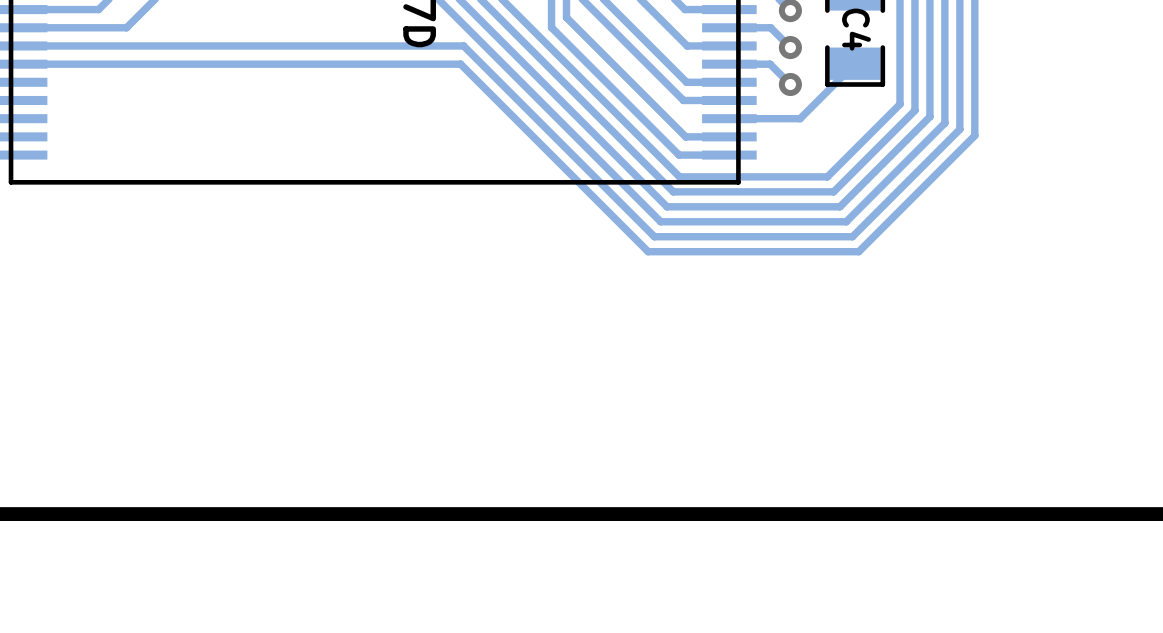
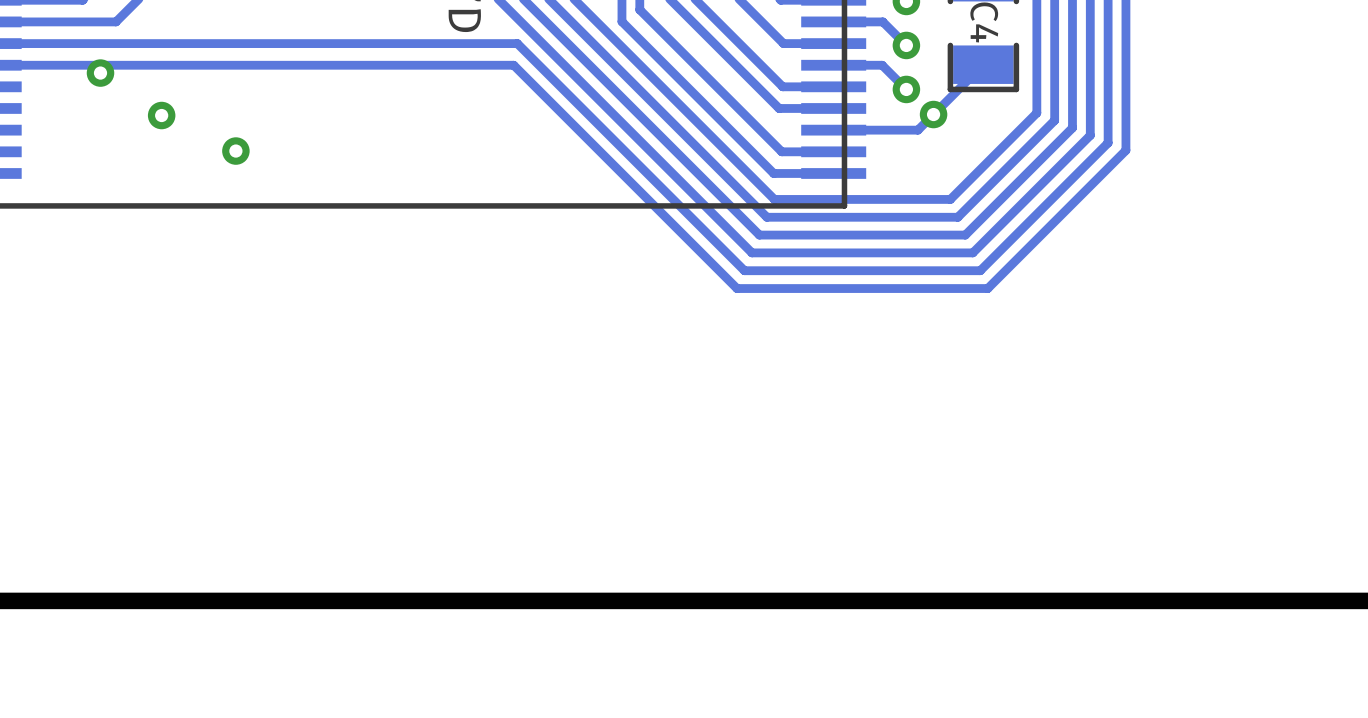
via: none -> (100, 73)
via: none -> (933, 114)
via: none -> (161, 115)
via: none -> (235, 151)

